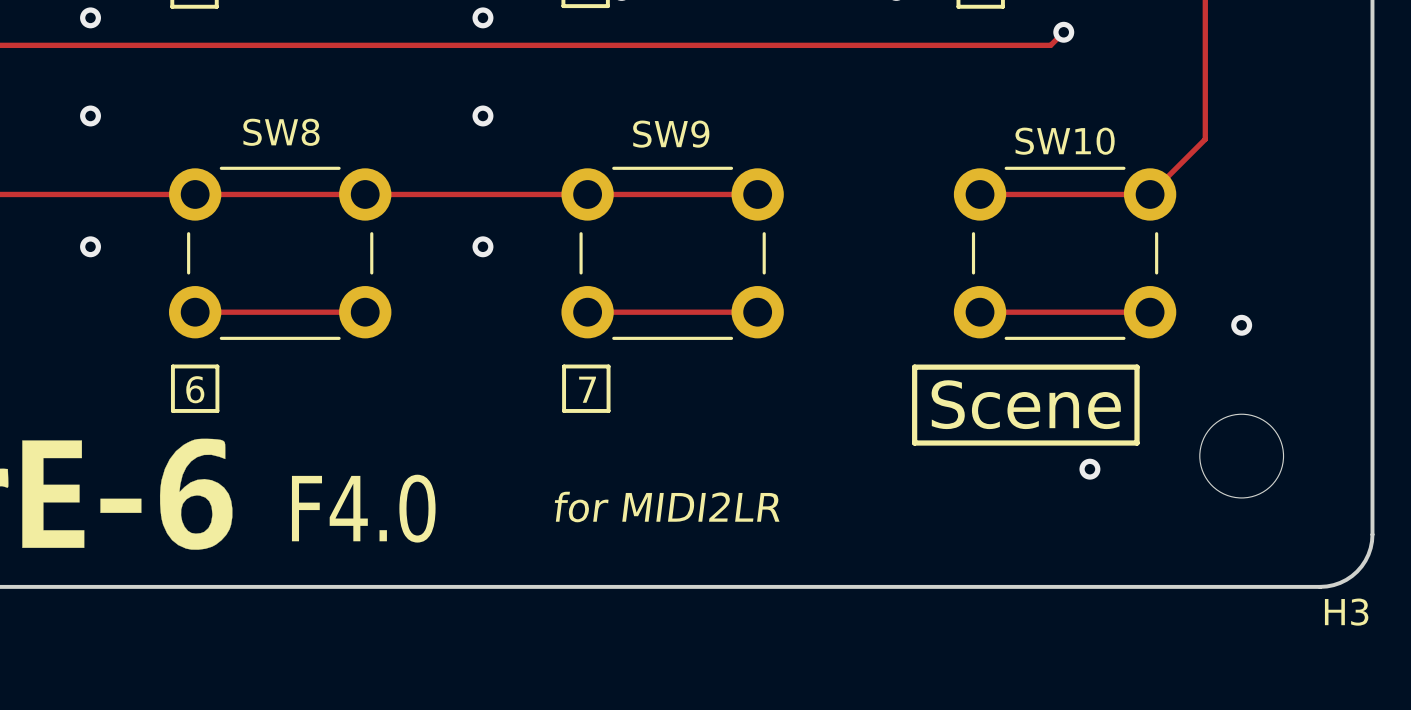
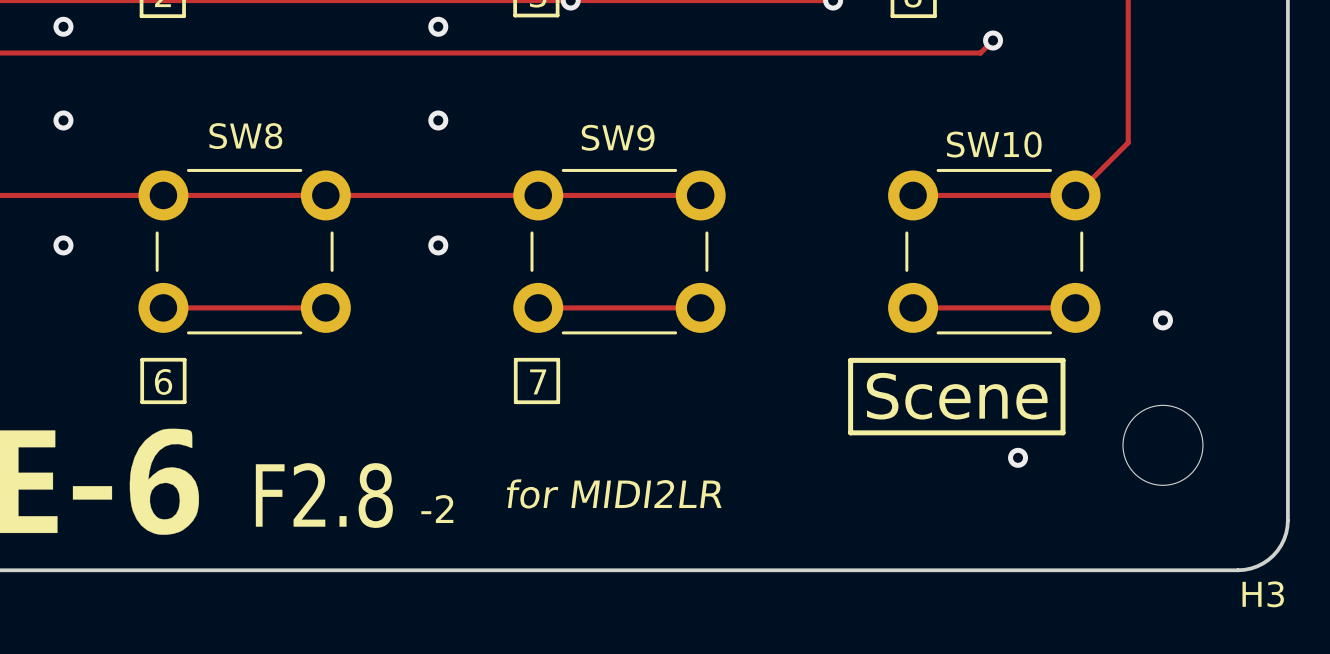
text: F4.0 (363, 508) -> F2.8 (324, 495)
text: none -> -2 (437, 509)

